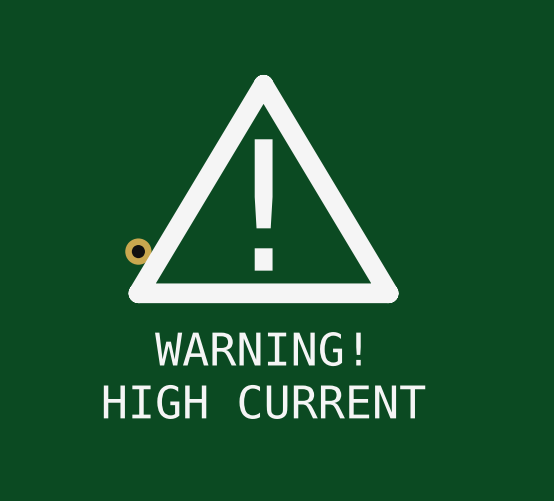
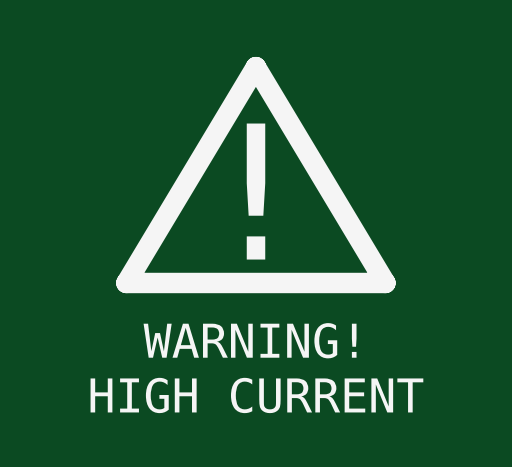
via: (138, 251) -> none

